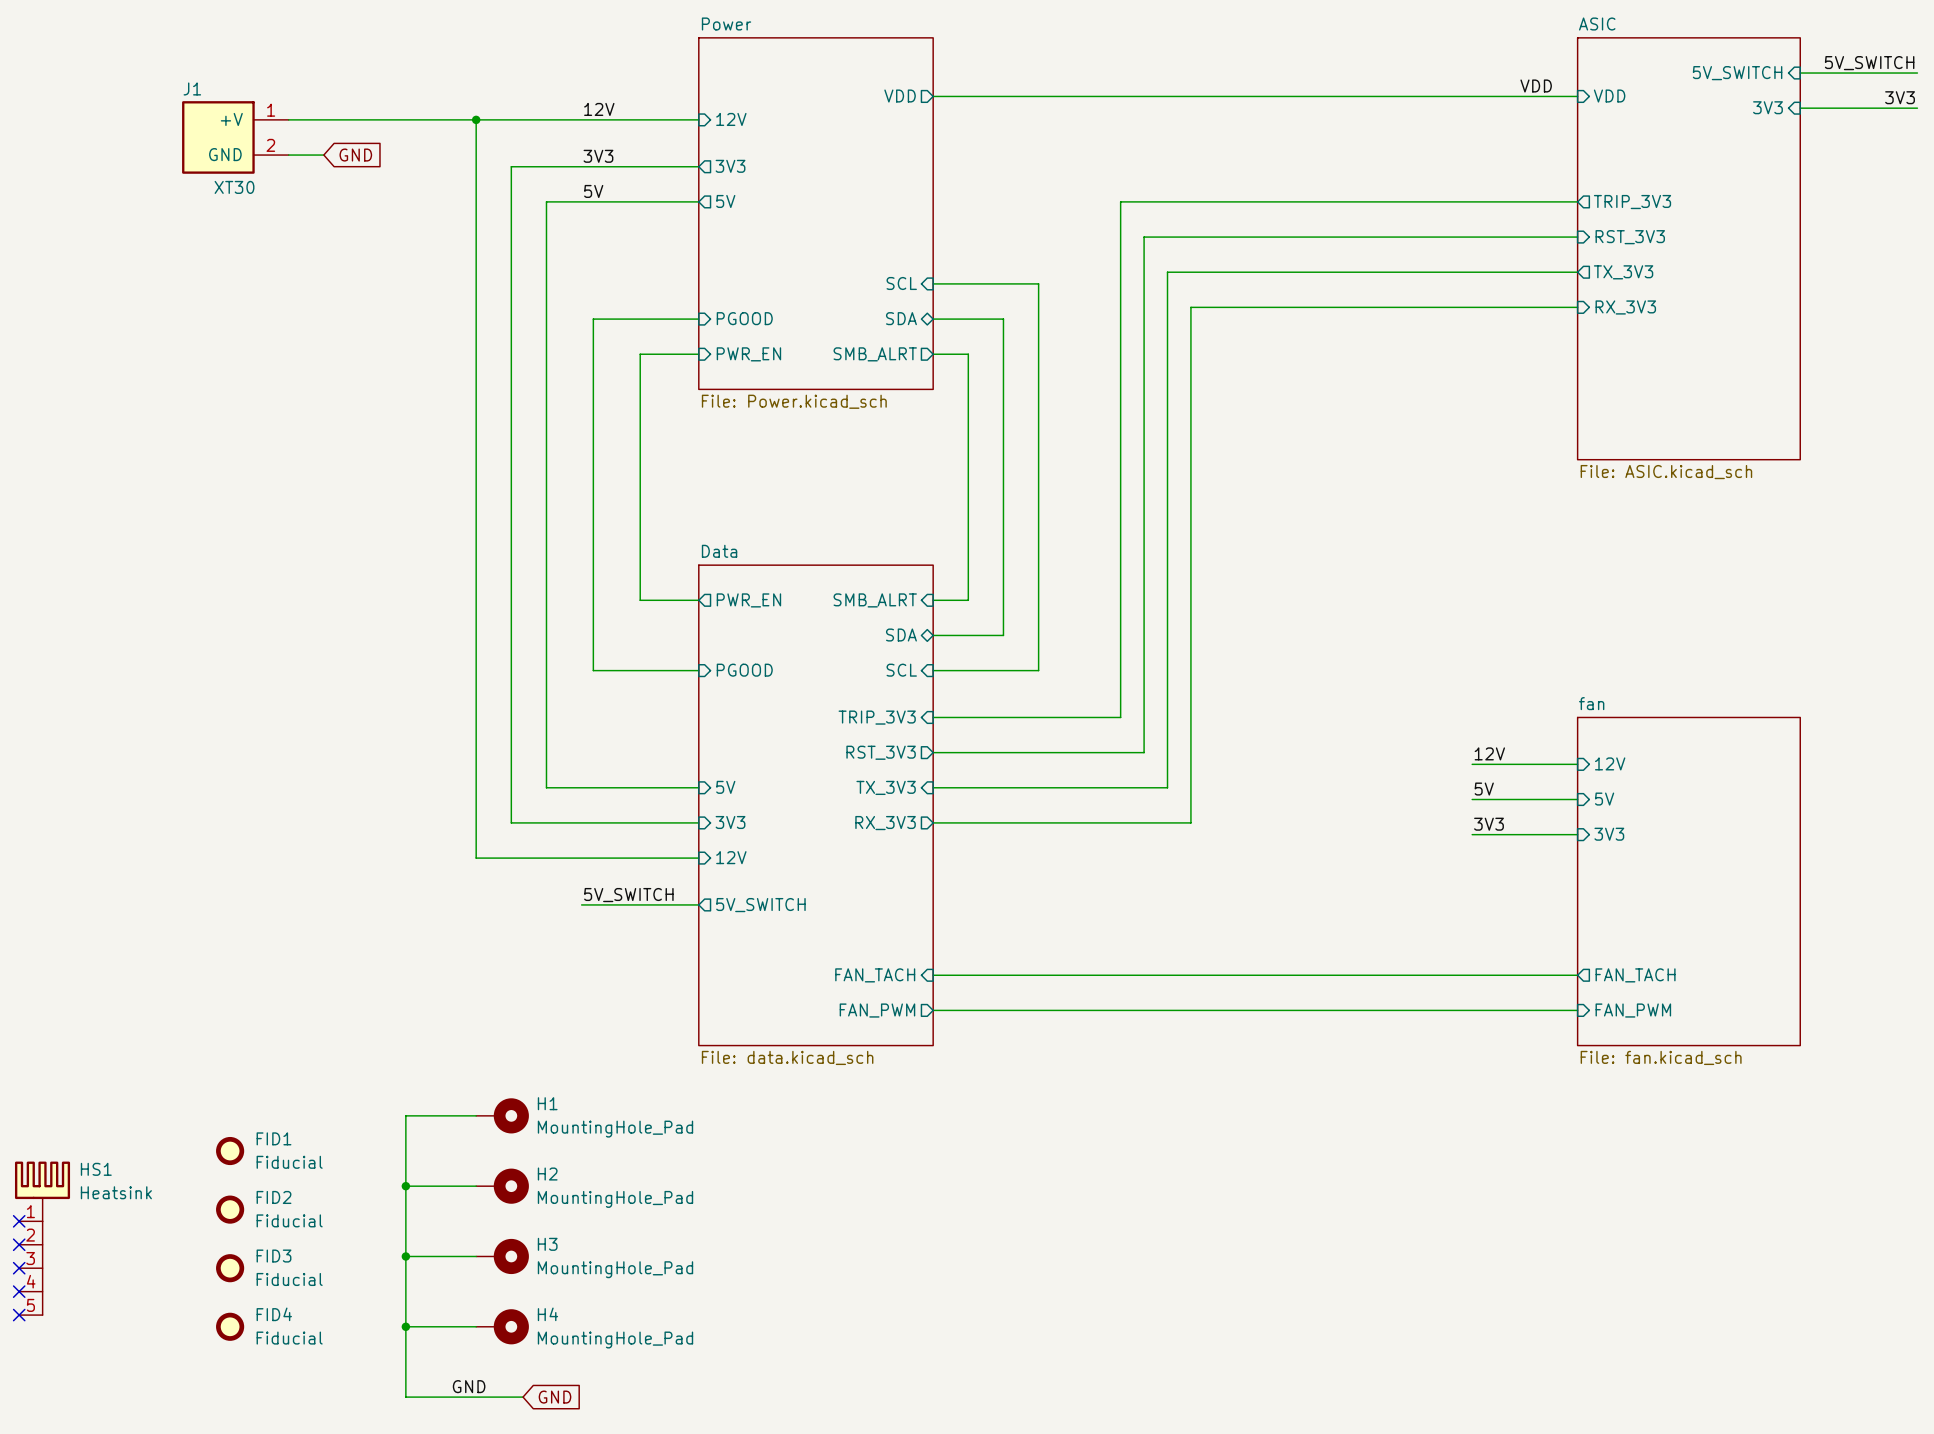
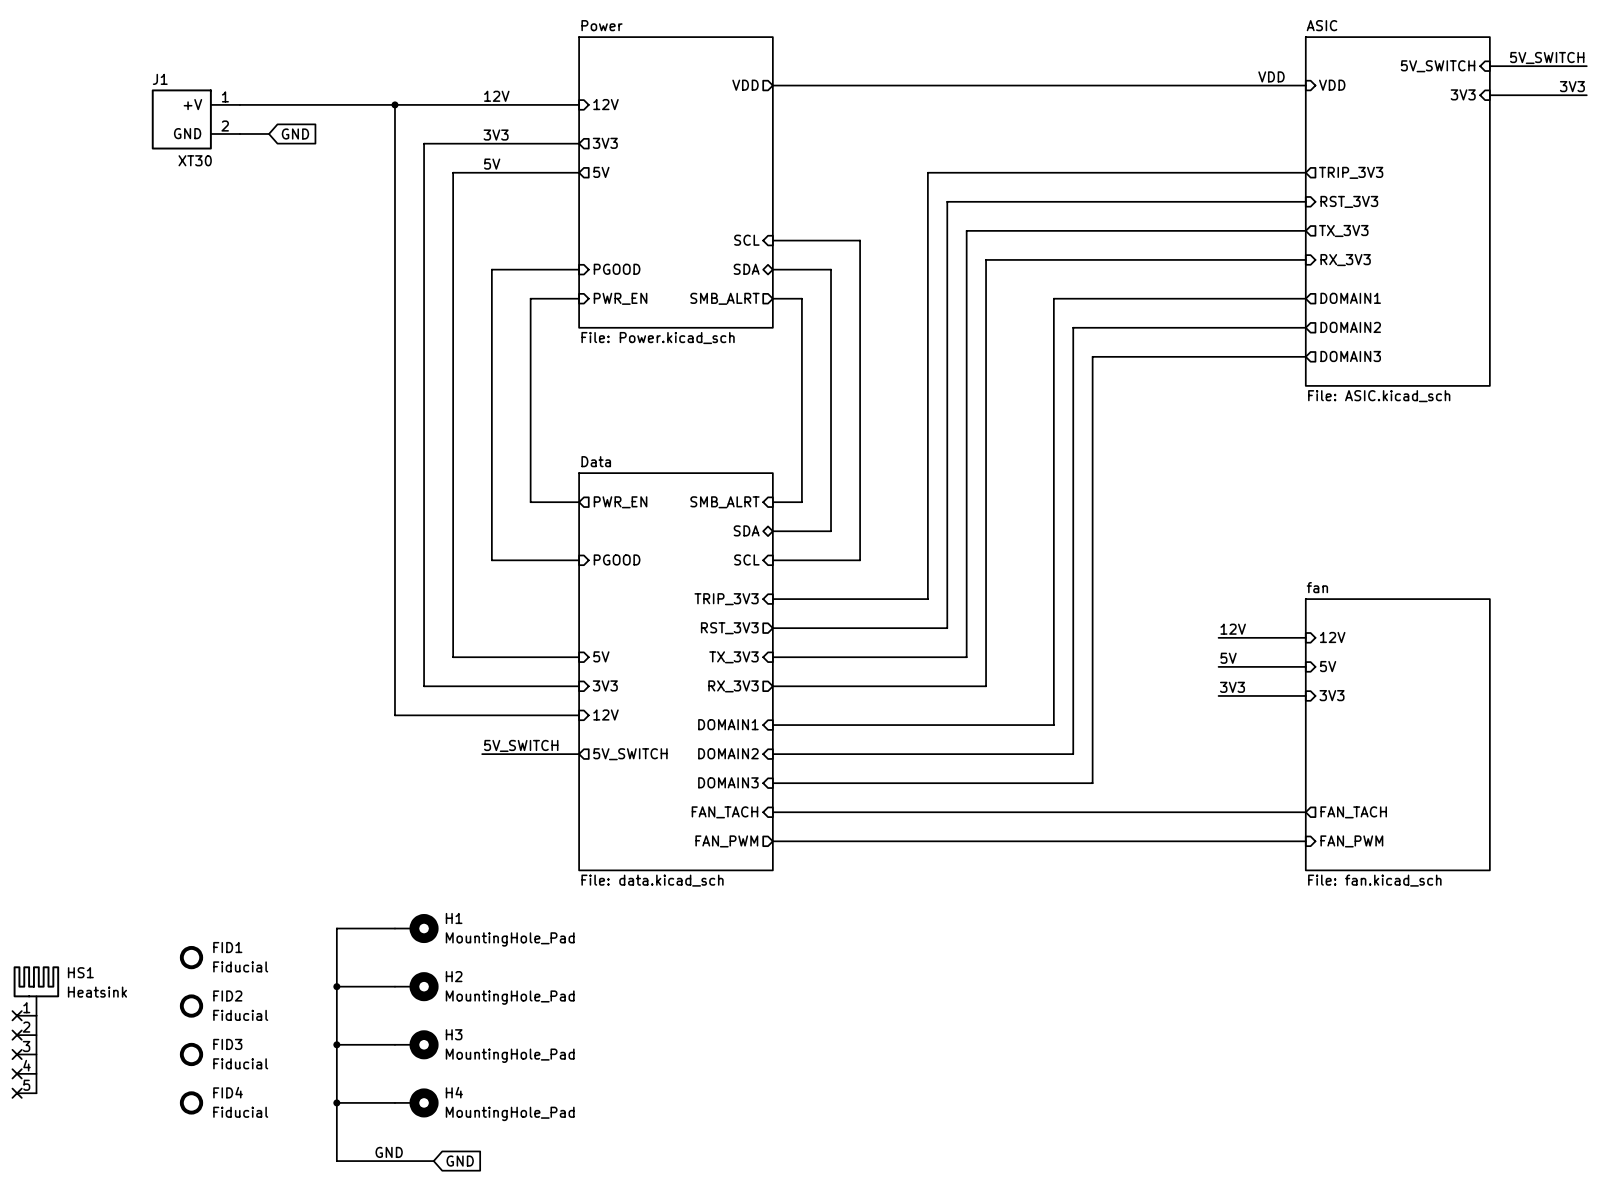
sheet pin: none -> DOMAIN1 (1350, 298)
wire: none -> (1305, 298) (1053, 298) (1053, 725) (772, 725)
sheet pin: none -> DOMAIN2 (1350, 327)
wire: none -> (1305, 327) (1073, 327) (1073, 754) (772, 754)
wire: none -> (1305, 356) (1092, 356) (1092, 783) (772, 783)
sheet pin: none -> DOMAIN3 (1350, 356)
sheet pin: none -> DOMAIN1 (728, 724)
sheet pin: none -> DOMAIN2 (728, 753)
sheet pin: none -> DOMAIN3 (728, 782)

